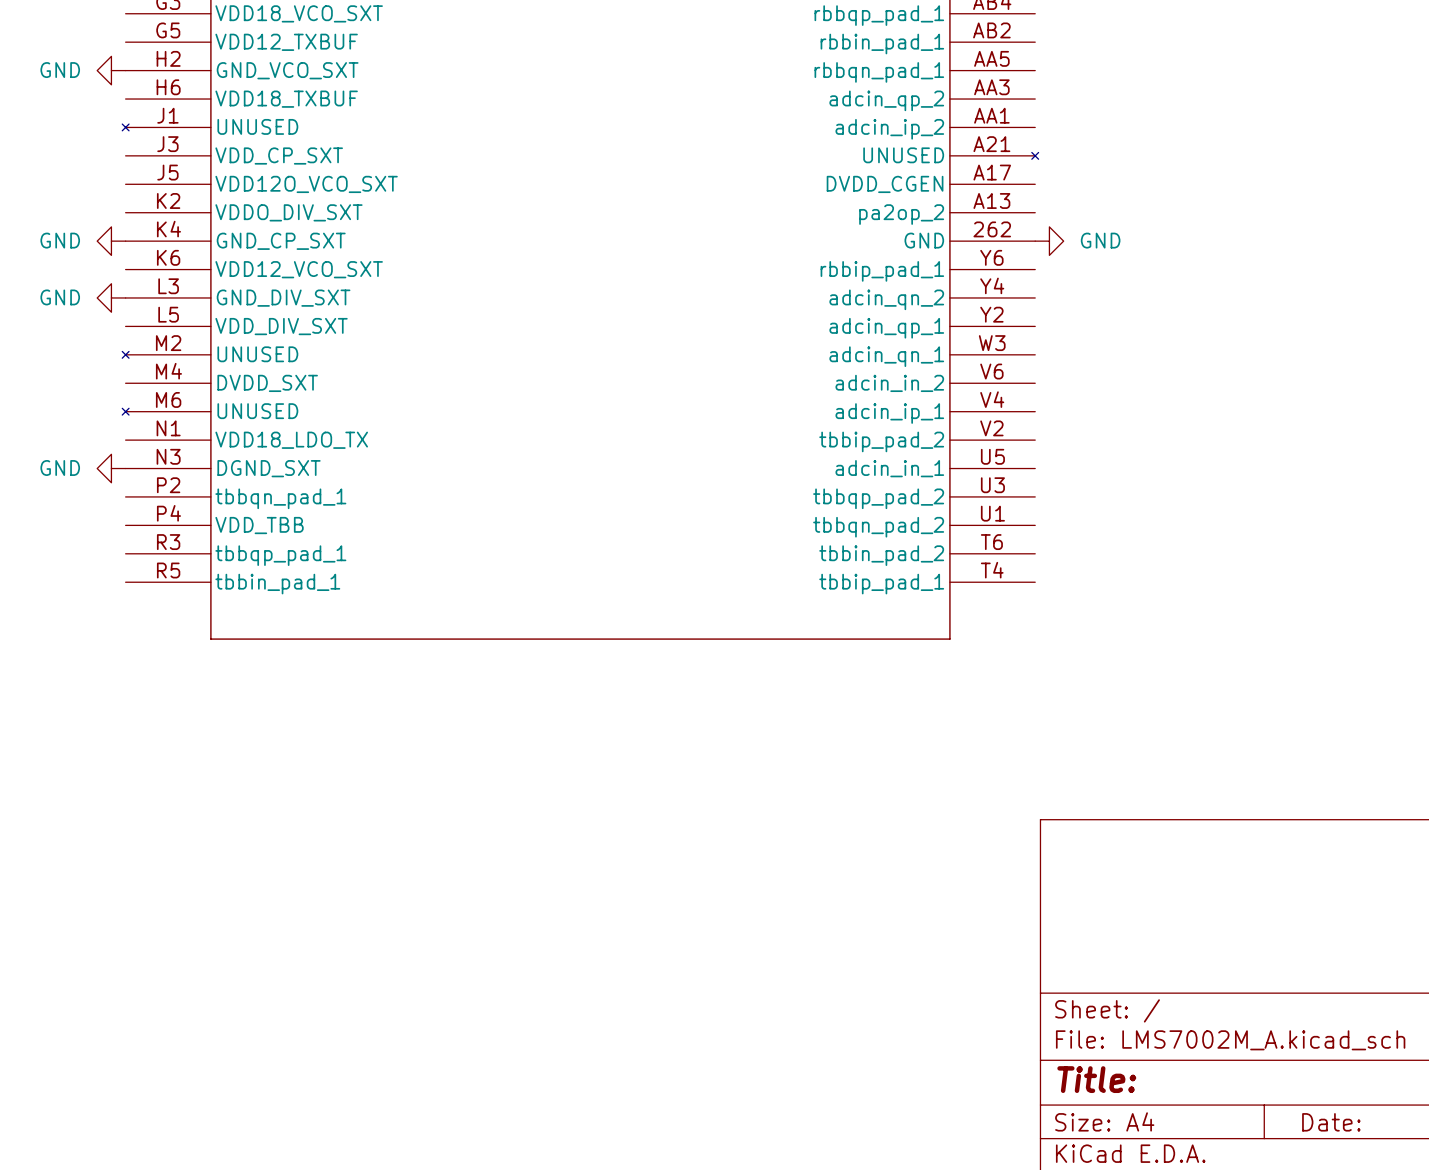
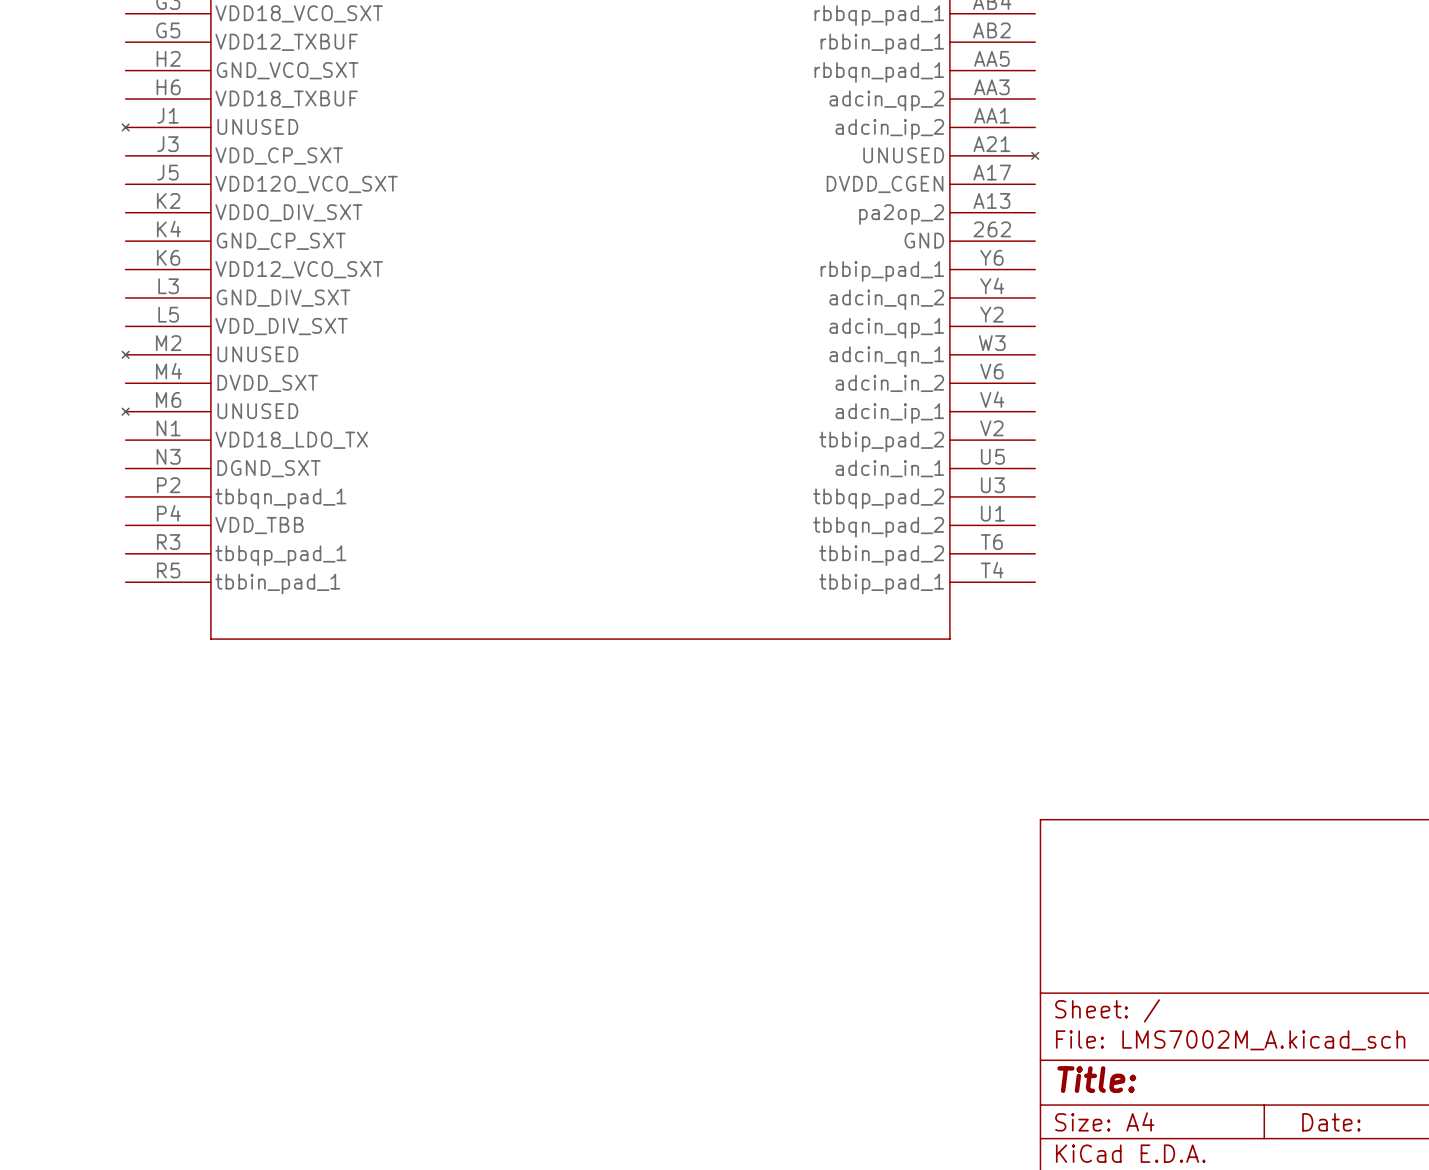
power symbol: GND (111, 70) -> none
power symbol: GND (111, 241) -> none
power symbol: GND (1049, 241) -> none
power symbol: GND (111, 297) -> none
power symbol: GND (111, 468) -> none

